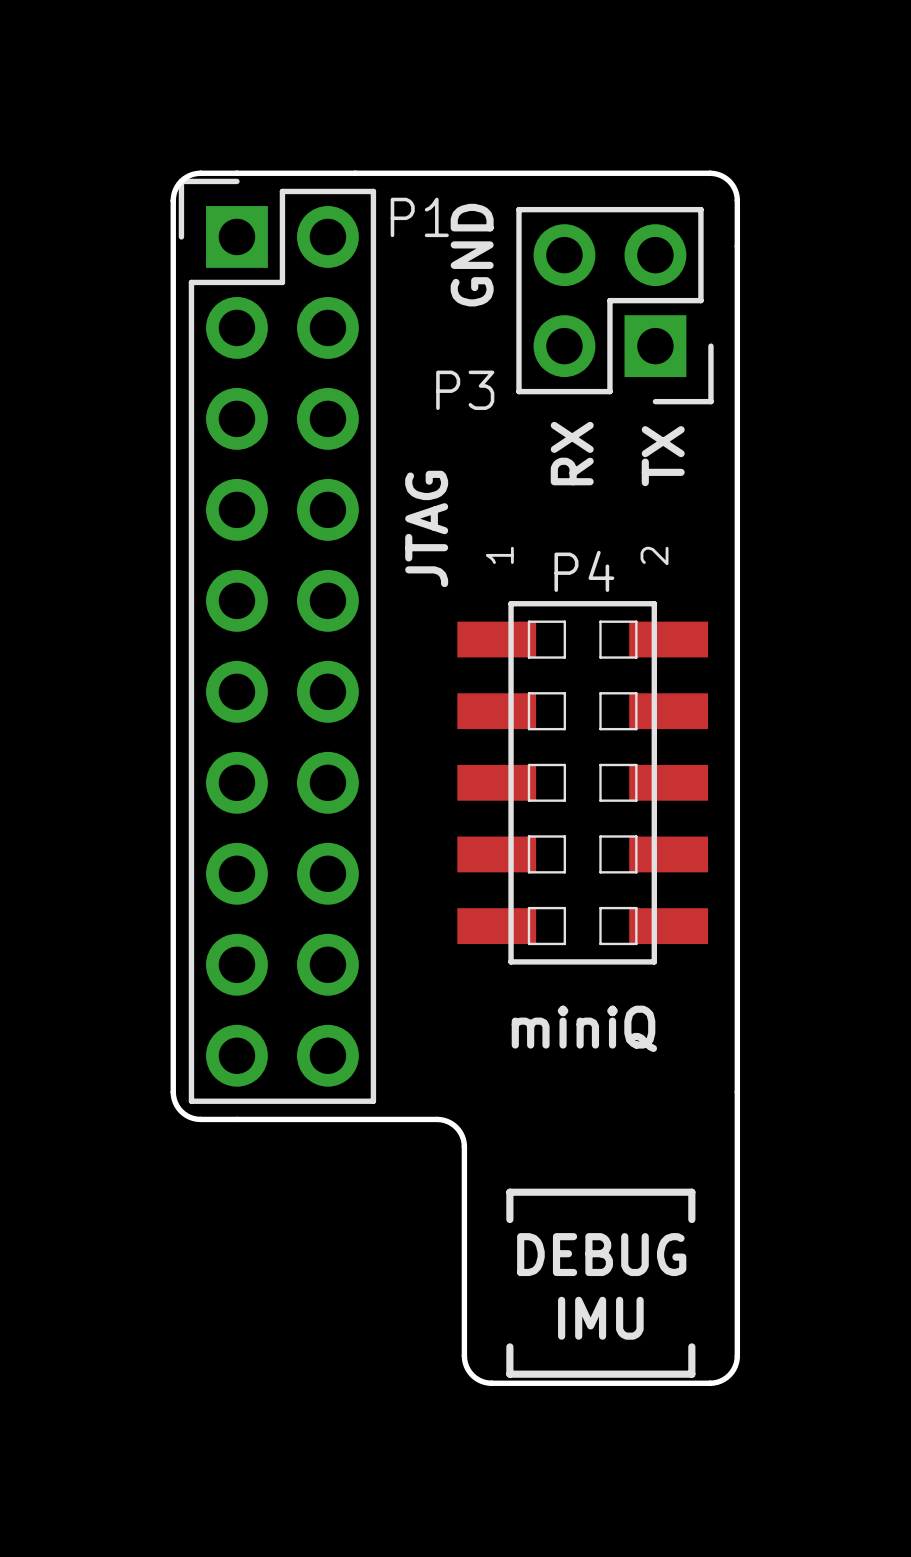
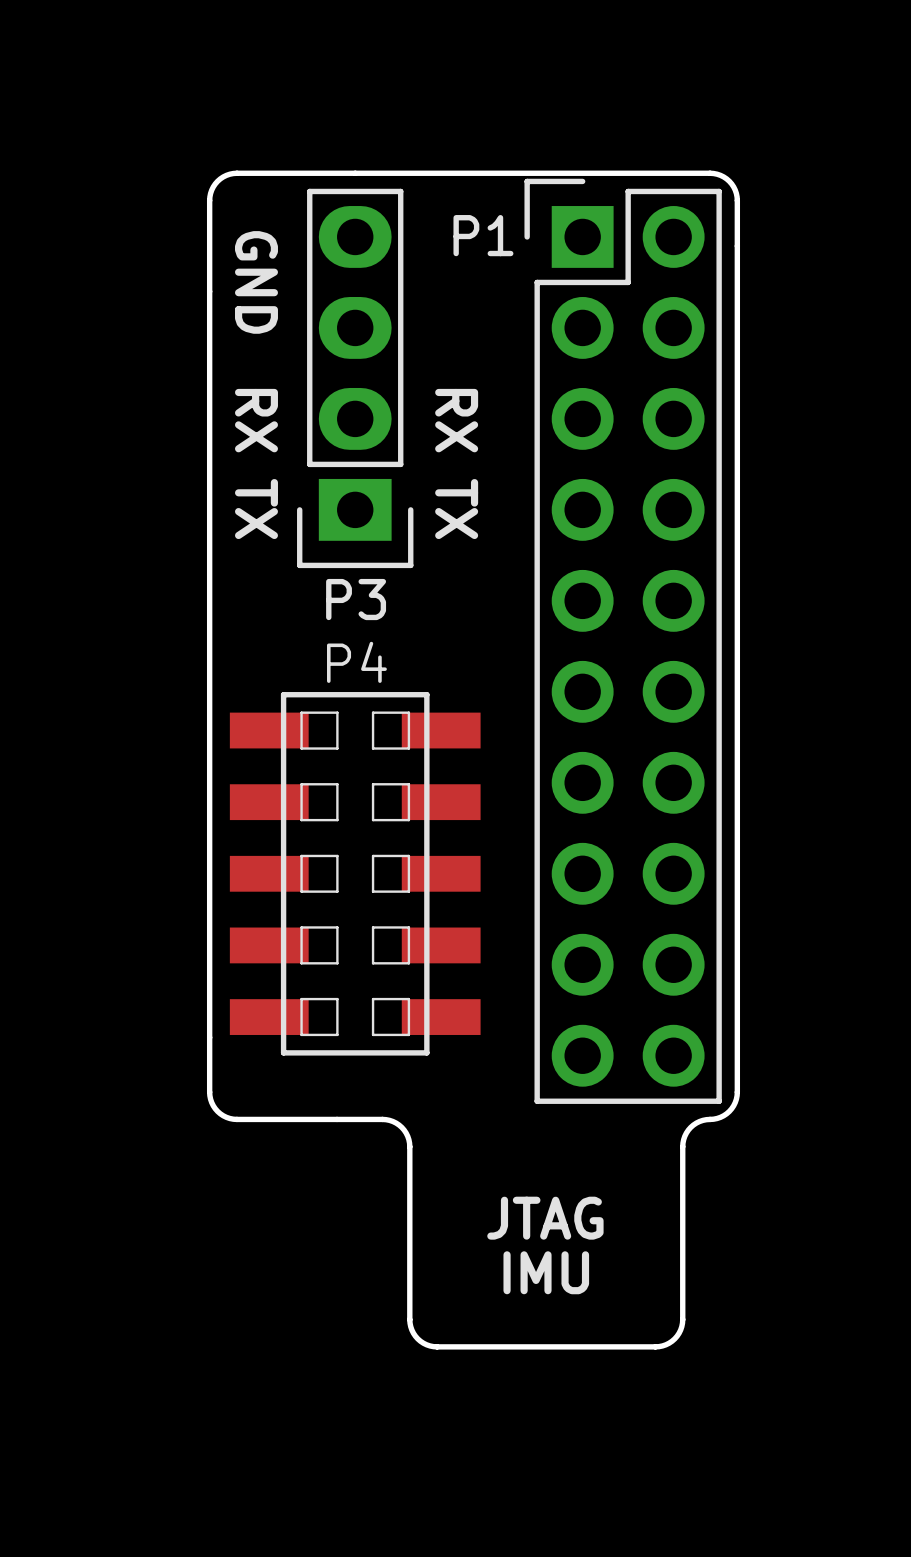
board edge: (236, 173) (200, 173) (190, 175) (178, 183) (173, 200) (173, 1095) (178, 1108) (190, 1117) (200, 1119) (236, 1119) -> (236, 173) (226, 175) (217, 181) (211, 190) (209, 200) (209, 1092) (211, 1102) (217, 1111) (226, 1117) (236, 1119)
P3 footprint: [516, 206, 714, 405] -> [297, 188, 414, 569]
P1 name position: P1 (419, 217) -> P1 (483, 235)
text rotation: 0° (472, 255) -> 180° (256, 282)
text position: GND (472, 255) -> GND (256, 282)
P3 name position: P3 (465, 390) -> P3 (356, 599)
text: none -> RX (256, 420)
text rotation: 0° (572, 453) -> 180° (456, 420)
text position: RX (572, 453) -> RX (456, 420)
text: TX (663, 456) -> none
text: none -> TX (256, 509)
text: none -> TX (456, 509)
text rotation: 0° (426, 528) -> 90° clockwise (545, 1218)
text position: JTAG (426, 528) -> JTAG (545, 1218)
text: 1 (499, 555) -> none
text: 2 (654, 555) -> none
P1 position: (277, 641) -> (623, 641)
P4 position: (582, 782) -> (355, 873)
text: miniQ (584, 1028) -> none
board edge: (737, 1092) (737, 1359) (729, 1375) (713, 1383) (491, 1383) (475, 1377) (466, 1366) (464, 1355) (464, 1146) (462, 1136) (456, 1127) (444, 1120) (382, 1119) -> (737, 1092) (735, 1102) (729, 1111) (720, 1117) (696, 1123) (688, 1130) (683, 1139) (682, 1323) (674, 1338) (659, 1346) (437, 1346) (420, 1341) (411, 1330) (409, 1319) (409, 1143) (401, 1127) (392, 1121) (382, 1119)
line: (509, 1219) (509, 1192) (691, 1192) (691, 1219) -> none
text: DEBUG (601, 1254) -> none
text position: IMU (600, 1318) -> IMU (546, 1272)
line: (509, 1346) (509, 1374) (691, 1374) (691, 1346) -> none

